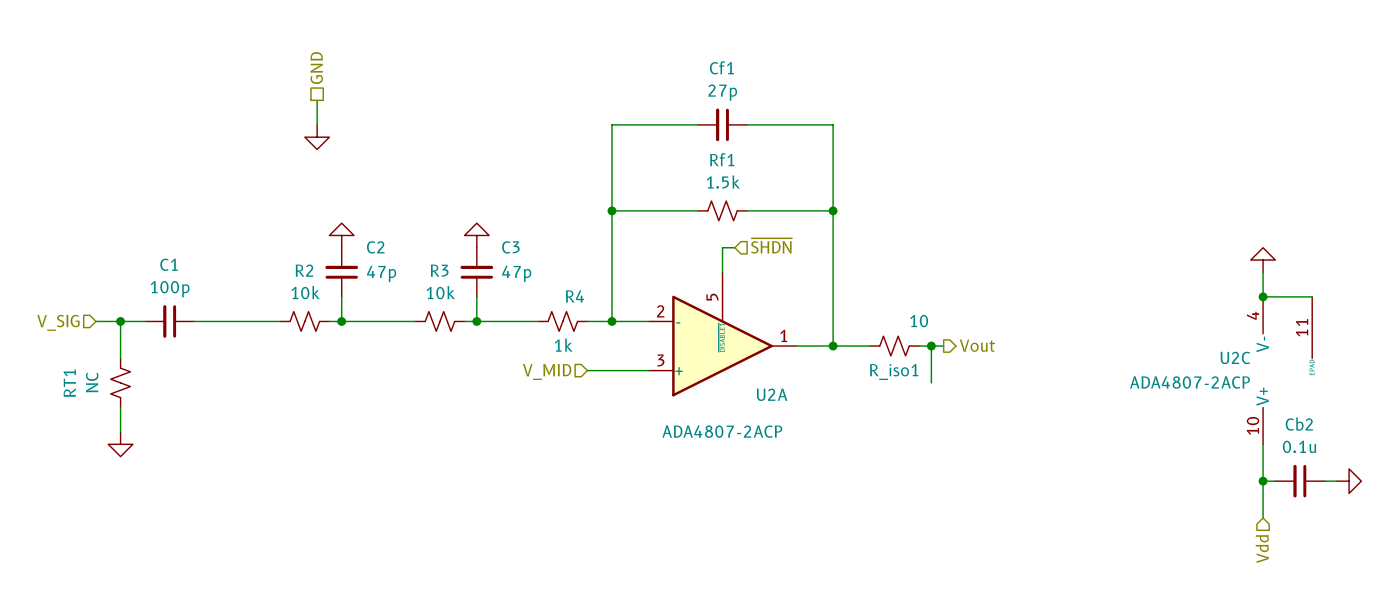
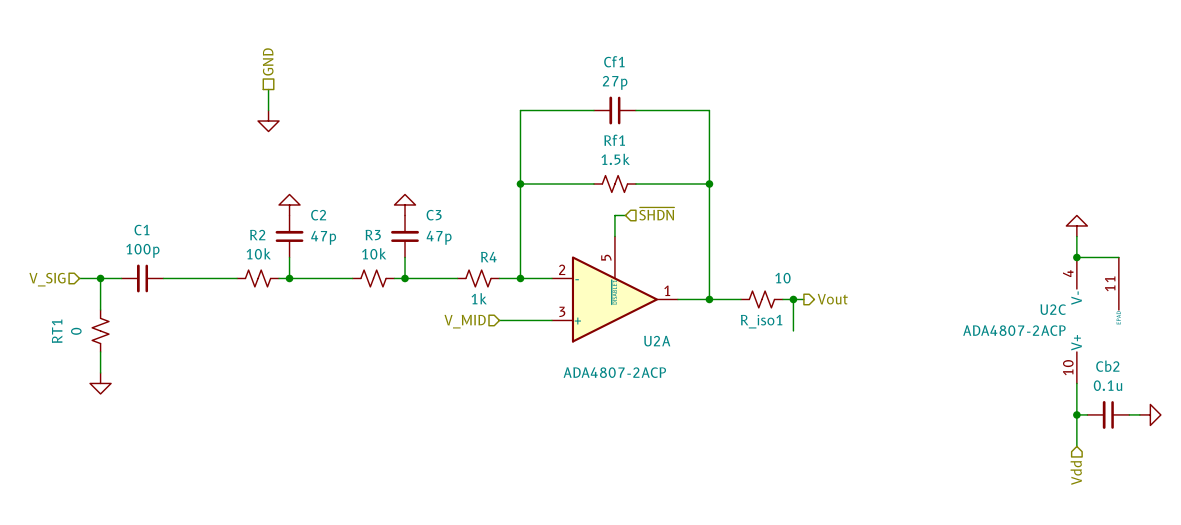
RT1 value: NC (92, 382) -> 0 (76, 331)

